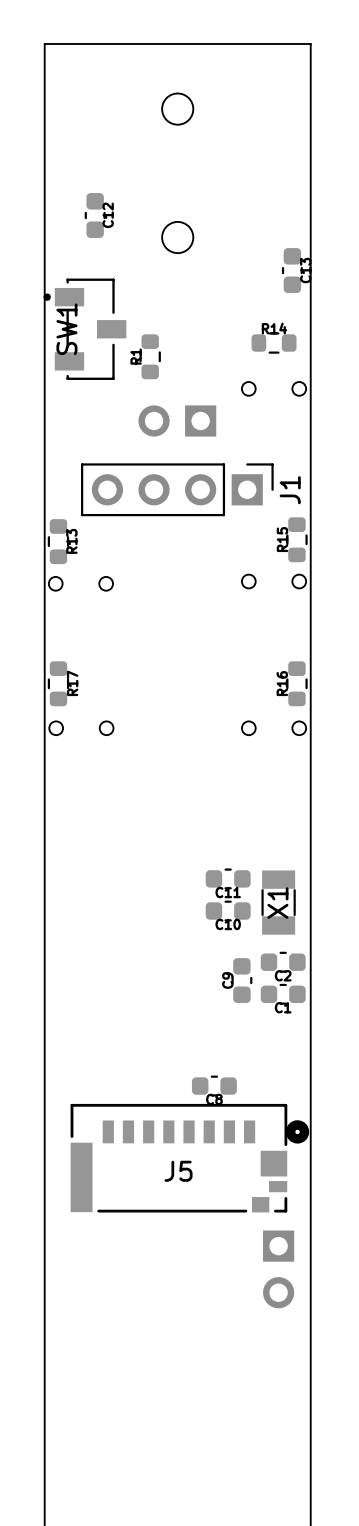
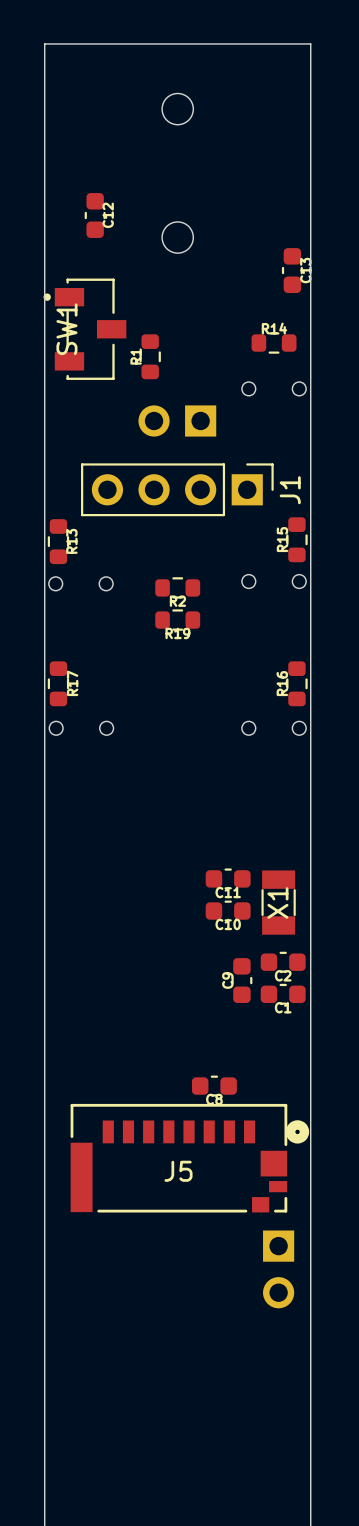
R2: none -> (177, 587)
R19: none -> (177, 620)

